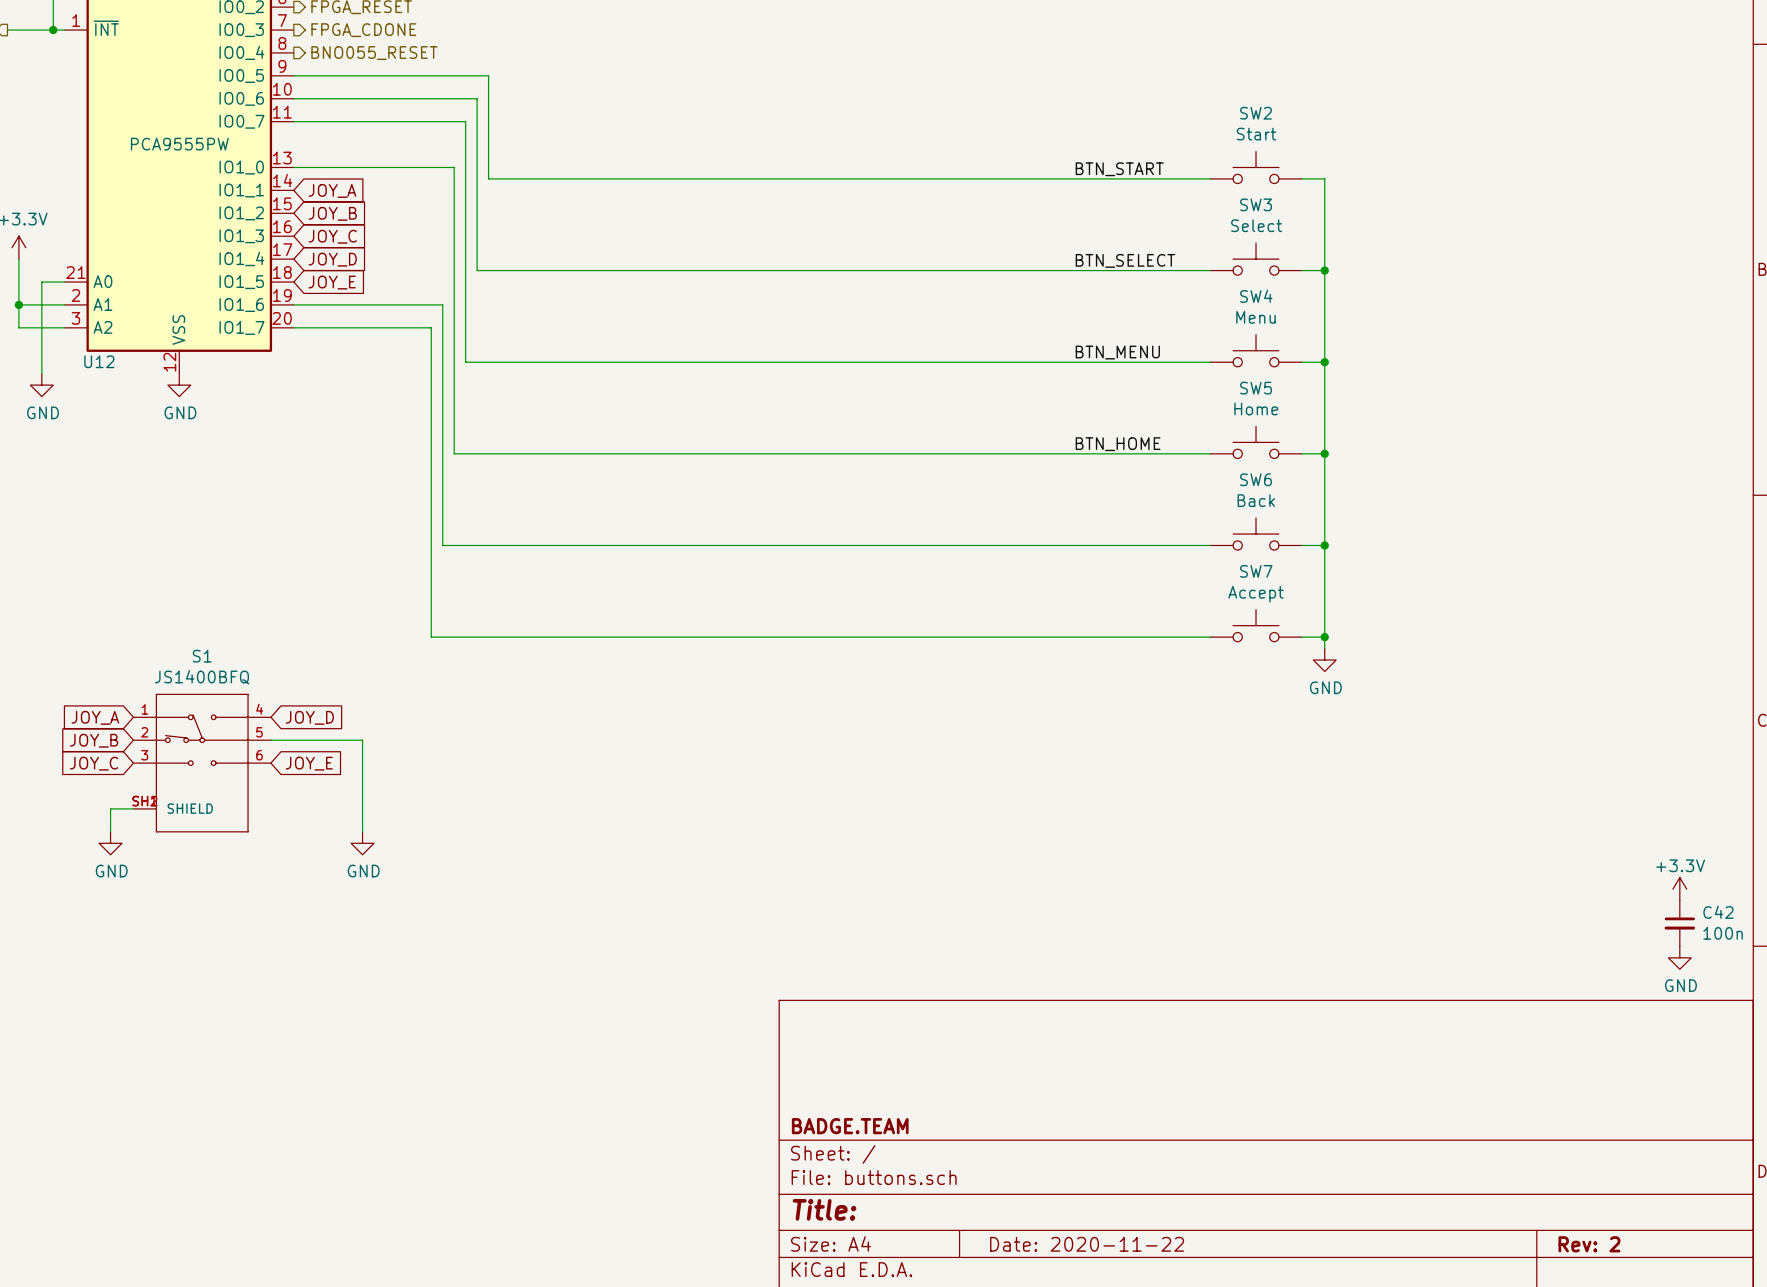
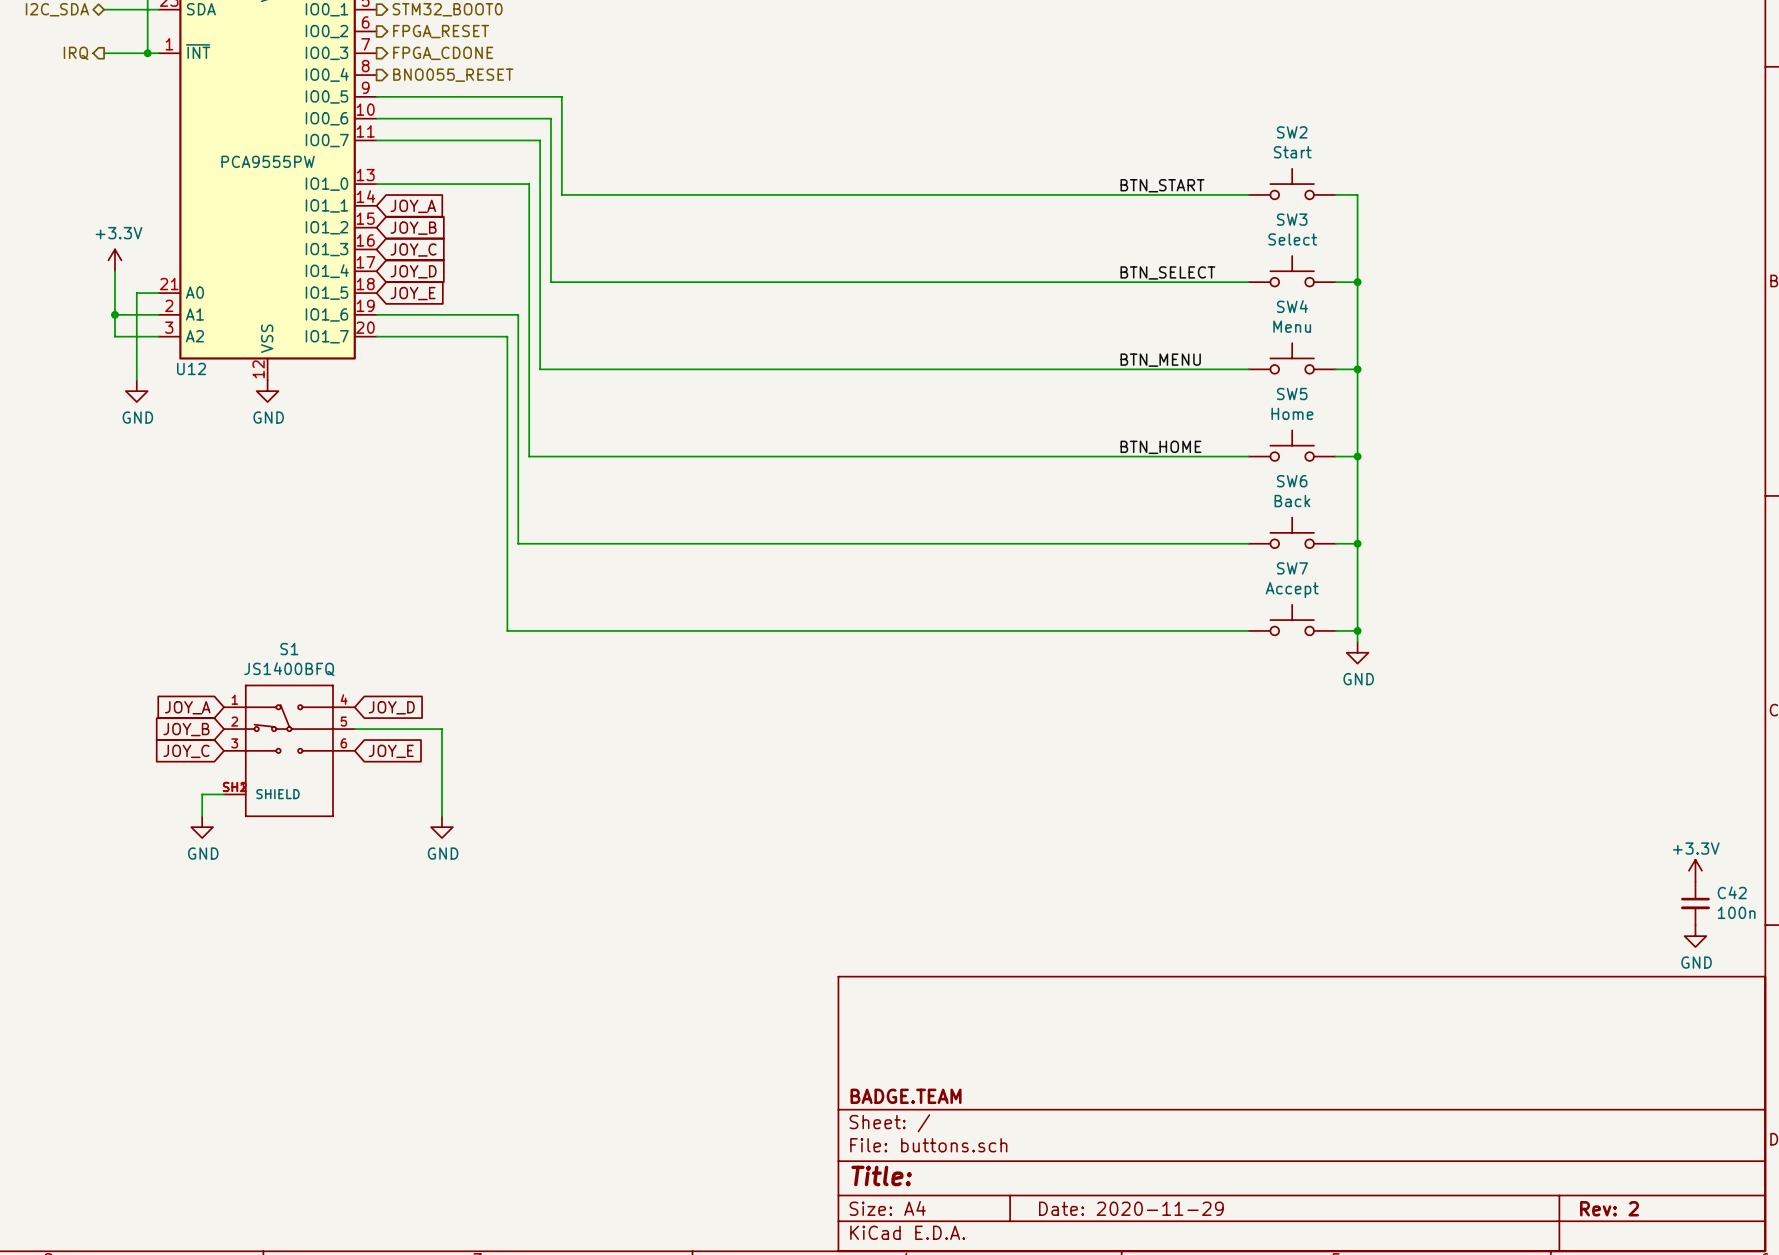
title block: Date: 2020-11-22 (1087, 1244) -> Date: 2020-11-29 (1131, 1208)

